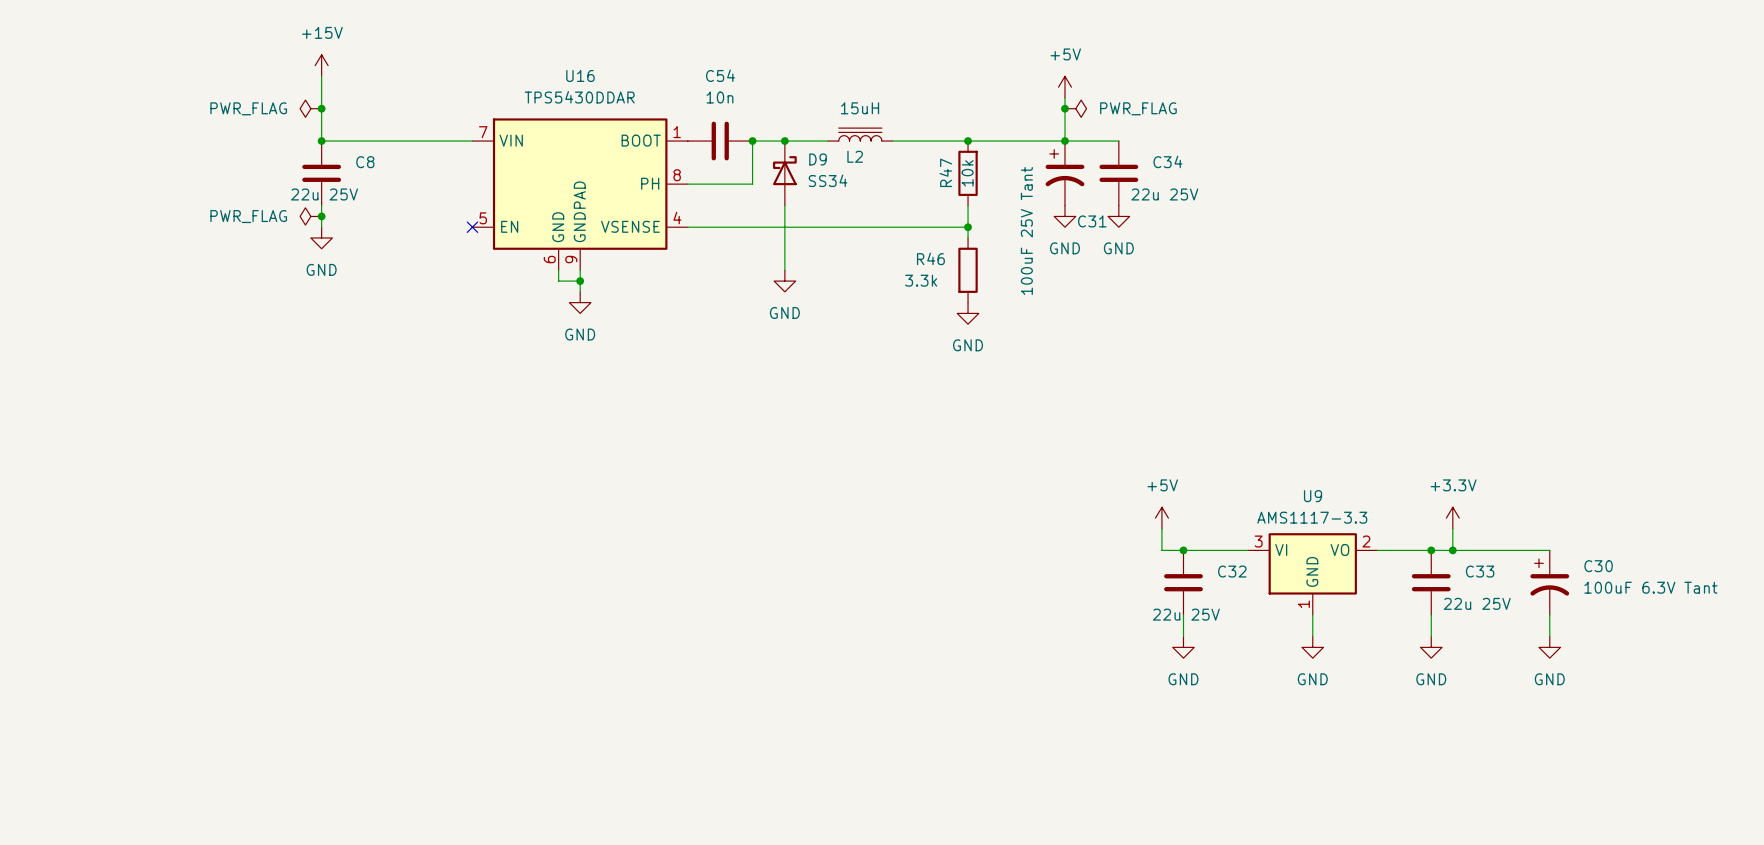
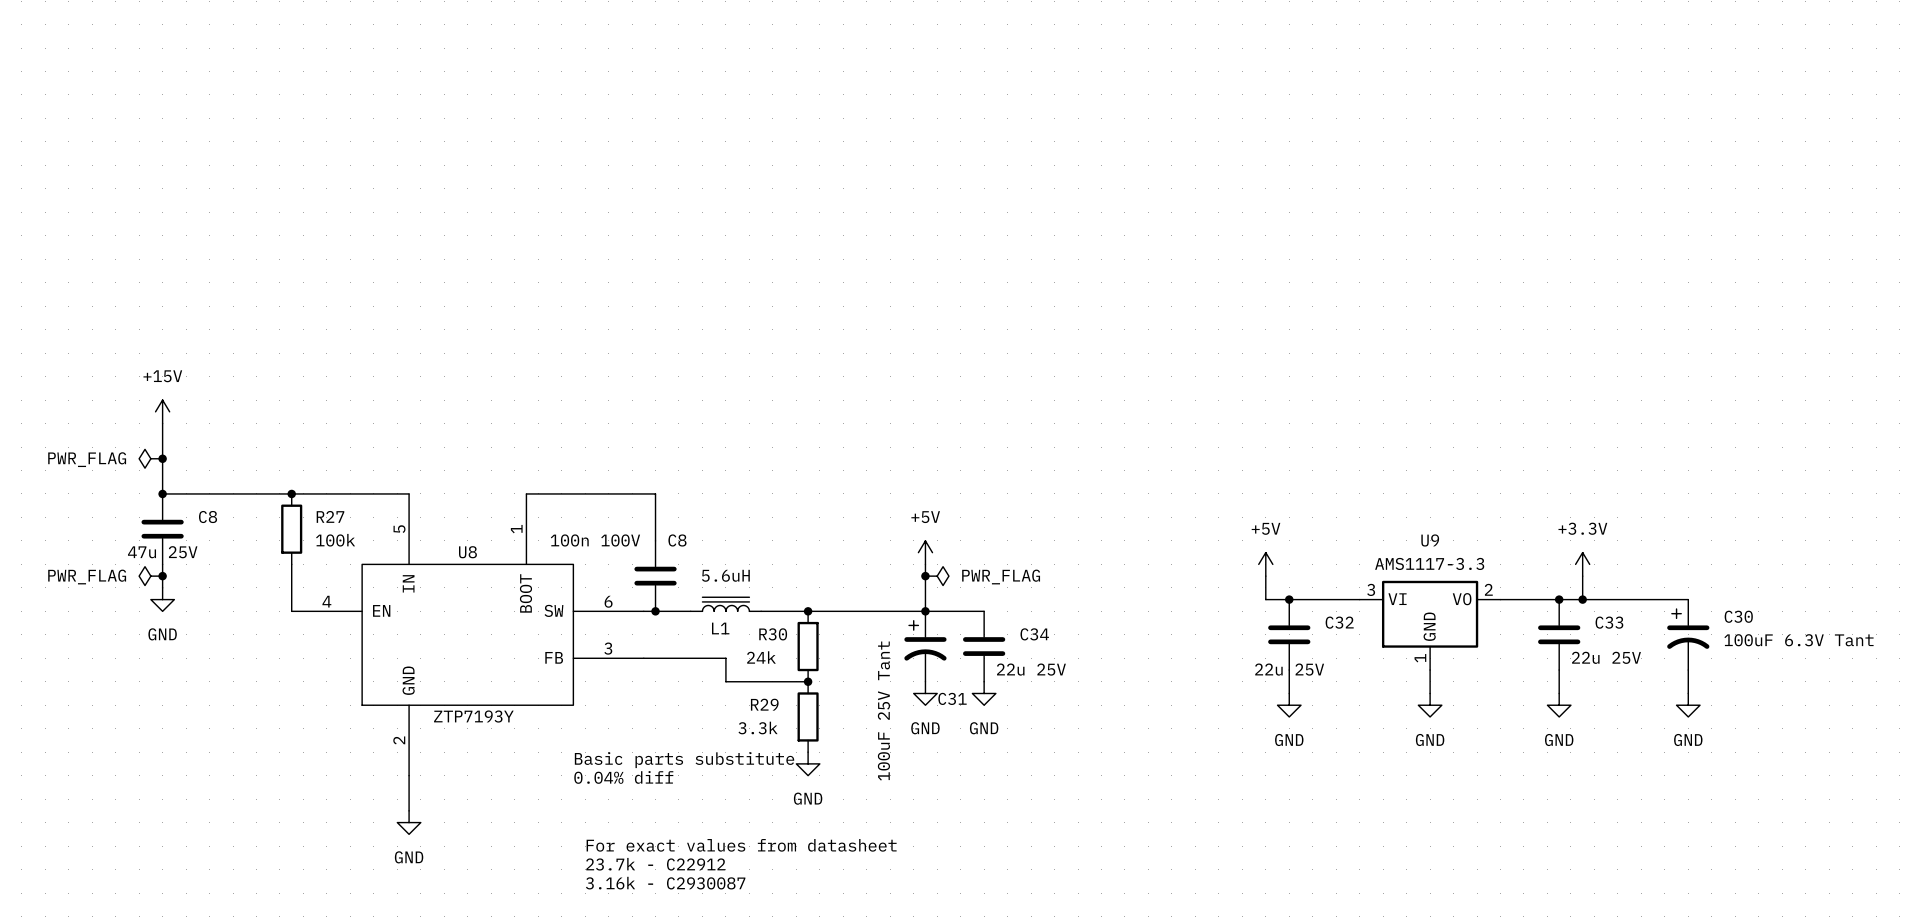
power symbol: +15V (321, 65) -> none
wire: (321, 76) (321, 141) (472, 141) -> none
power symbol: +5V (1064, 87) -> none
wire: (1064, 97) (1064, 141) -> none
power symbol: PWR_FLAG (310, 108) -> none
junction: (321, 108) -> none
junction: (1064, 108) -> none
power symbol: PWR_FLAG (1075, 108) -> none
L2: 15uH (860, 134) -> none
junction: (321, 141) -> none
C54: 10n (720, 141) -> none
junction: (752, 141) -> none
junction: (784, 141) -> none
wire: (827, 141) (752, 141) (752, 184) (687, 184) -> none
wire: (892, 141) (1118, 141) -> none
junction: (968, 141) -> none
junction: (1064, 141) -> none
C8: 22u 25V (321, 173) -> none
D9: SS34 (784, 173) -> none
R47: 10k (968, 173) -> none
C31 position: (1064, 173) -> (925, 646)
C34 position: (1118, 173) -> (984, 646)
U16: TPS5430DDAR (580, 194) -> none
wire: (321, 205) (321, 227) -> none
wire: (784, 205) (784, 270) -> none
wire: (968, 205) (968, 237) -> none
power symbol: PWR_FLAG (310, 216) -> none
junction: (321, 216) -> none
power symbol: GND (1064, 216) -> none
power symbol: GND (1118, 216) -> none
no-connect mark: (472, 227) -> none
wire: (687, 227) (968, 227) -> none
junction: (968, 227) -> none
power symbol: GND (321, 237) -> none
wire: (558, 270) (558, 281) (580, 281) -> none
wire: (580, 270) (580, 291) -> none
R46: 3.3k (968, 270) -> none
junction: (580, 281) -> none
power symbol: GND (784, 281) -> none
power symbol: GND (580, 302) -> none
power symbol: GND (968, 313) -> none
power symbol: none -> +15V (162, 411)
wire: none -> (162, 423) (162, 493) (409, 493)
power symbol: none -> PWR_FLAG (150, 458)
junction: none -> (162, 458)
junction: none -> (162, 493)
junction: none -> (291, 493)
wire: none -> (526, 493) (655, 493) (655, 540)
C8: none -> 47u 25V (162, 529)
R27: none -> 100k (291, 529)
power symbol: none -> +5V (925, 552)
wire: none -> (162, 564) (162, 587)
wire: none -> (291, 564) (291, 611)
wire: none -> (925, 564) (925, 611)
power symbol: none -> PWR_FLAG (150, 576)
junction: none -> (162, 576)
C8: none -> 100n 100V (655, 576)
junction: none -> (925, 576)
power symbol: none -> PWR_FLAG (937, 576)
power symbol: none -> GND (162, 599)
L1: none -> 5.6uH (725, 604)
wire: none -> (643, 611) (690, 611)
junction: none -> (655, 611)
wire: none -> (761, 611) (984, 611)
junction: none -> (808, 611)
junction: none -> (925, 611)
U8: none -> ZTP7193Y (467, 634)
R30: none -> 24k (808, 646)
wire: none -> (643, 658) (725, 658) (725, 681) (808, 681)
junction: none -> (808, 681)
power symbol: none -> GND (925, 693)
power symbol: none -> GND (984, 693)
R29: none -> 3.3k (808, 716)
text: none -> Basic parts substitute (684, 760)
power symbol: none -> GND (808, 763)
wire: none -> (409, 775) (409, 810)
text: none -> 0.04% diff (623, 777)
power symbol: none -> GND (409, 822)
text: none -> For exact values from datasheet (741, 845)
text: none -> 23.7k - C22912 (655, 864)
text: none -> 3.16k - C2930087 (665, 883)

